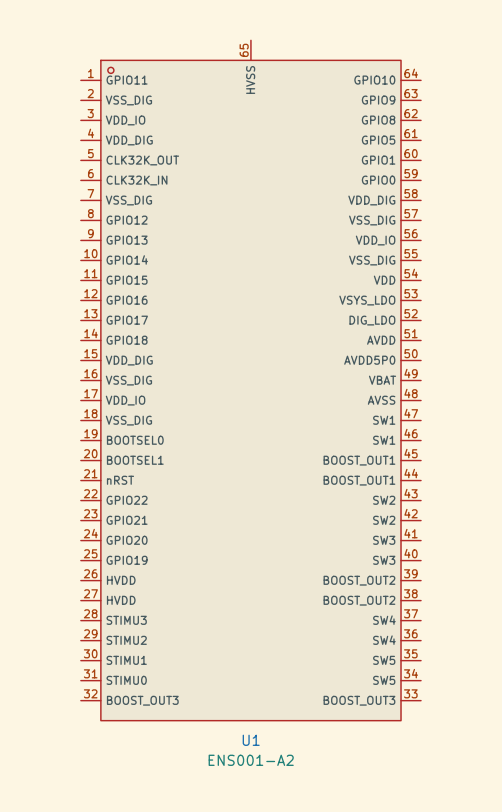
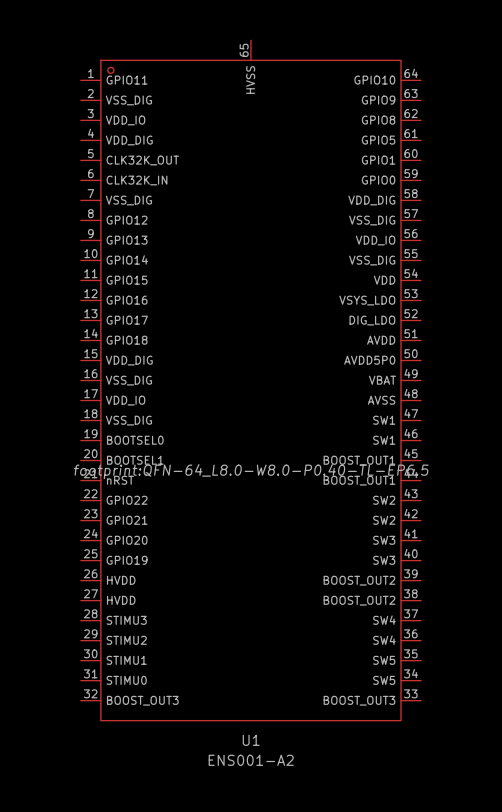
U1 text: none -> footprint:QFN-64_L8.0-W8.0-P0.40-TL-EP6.5 (251, 471)

